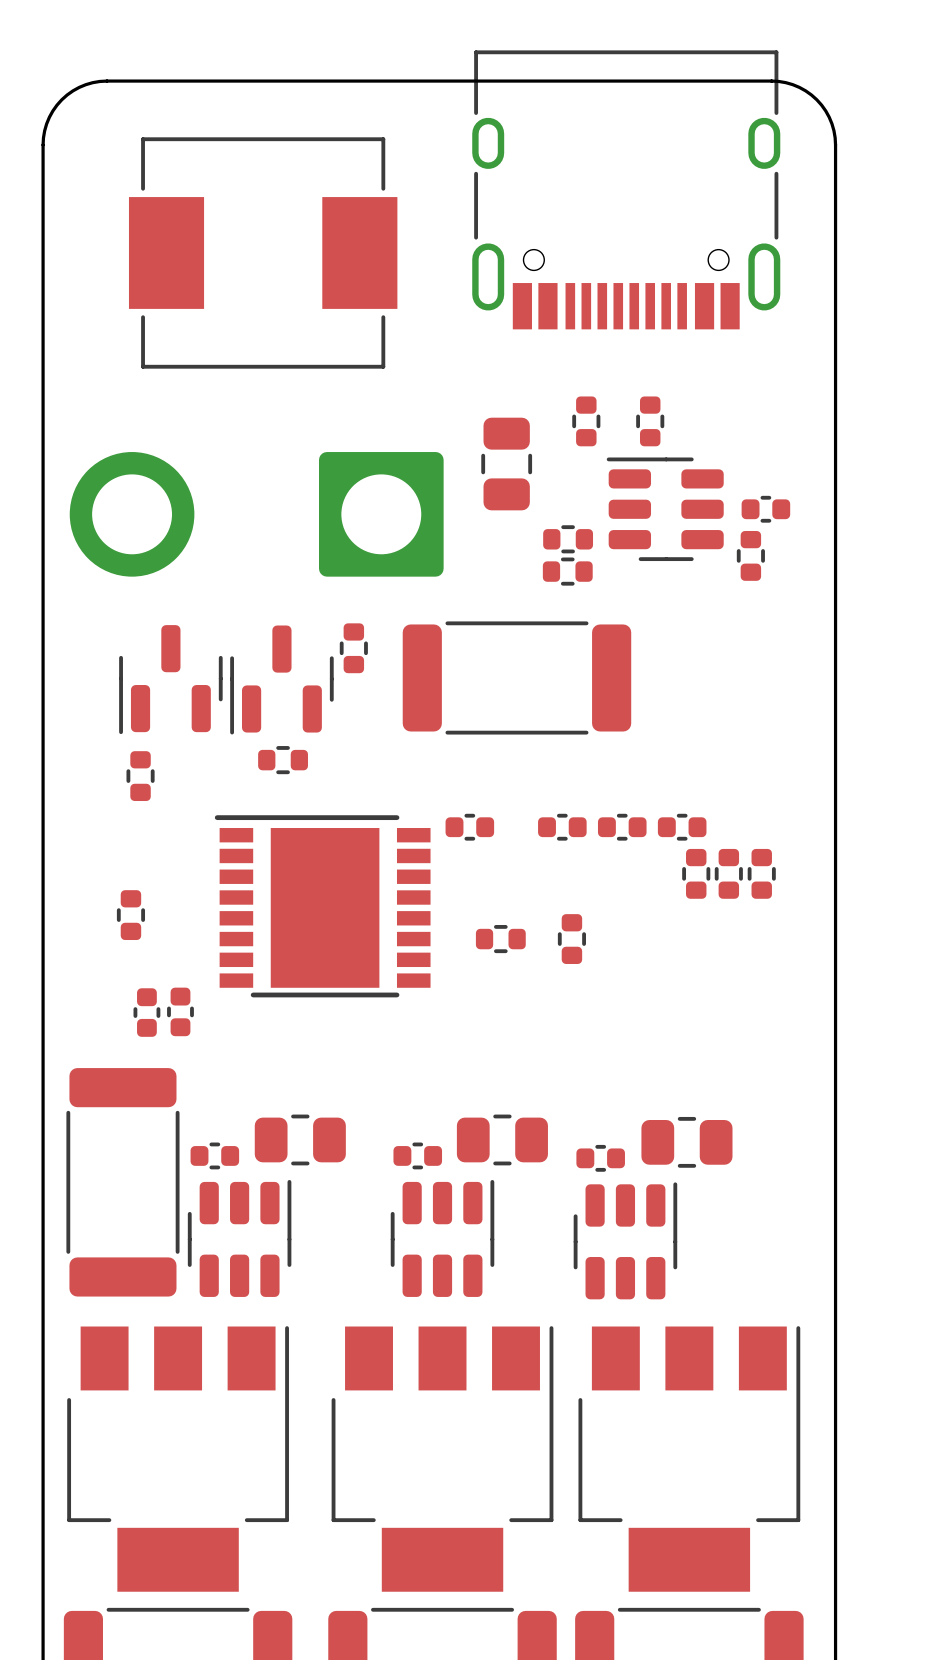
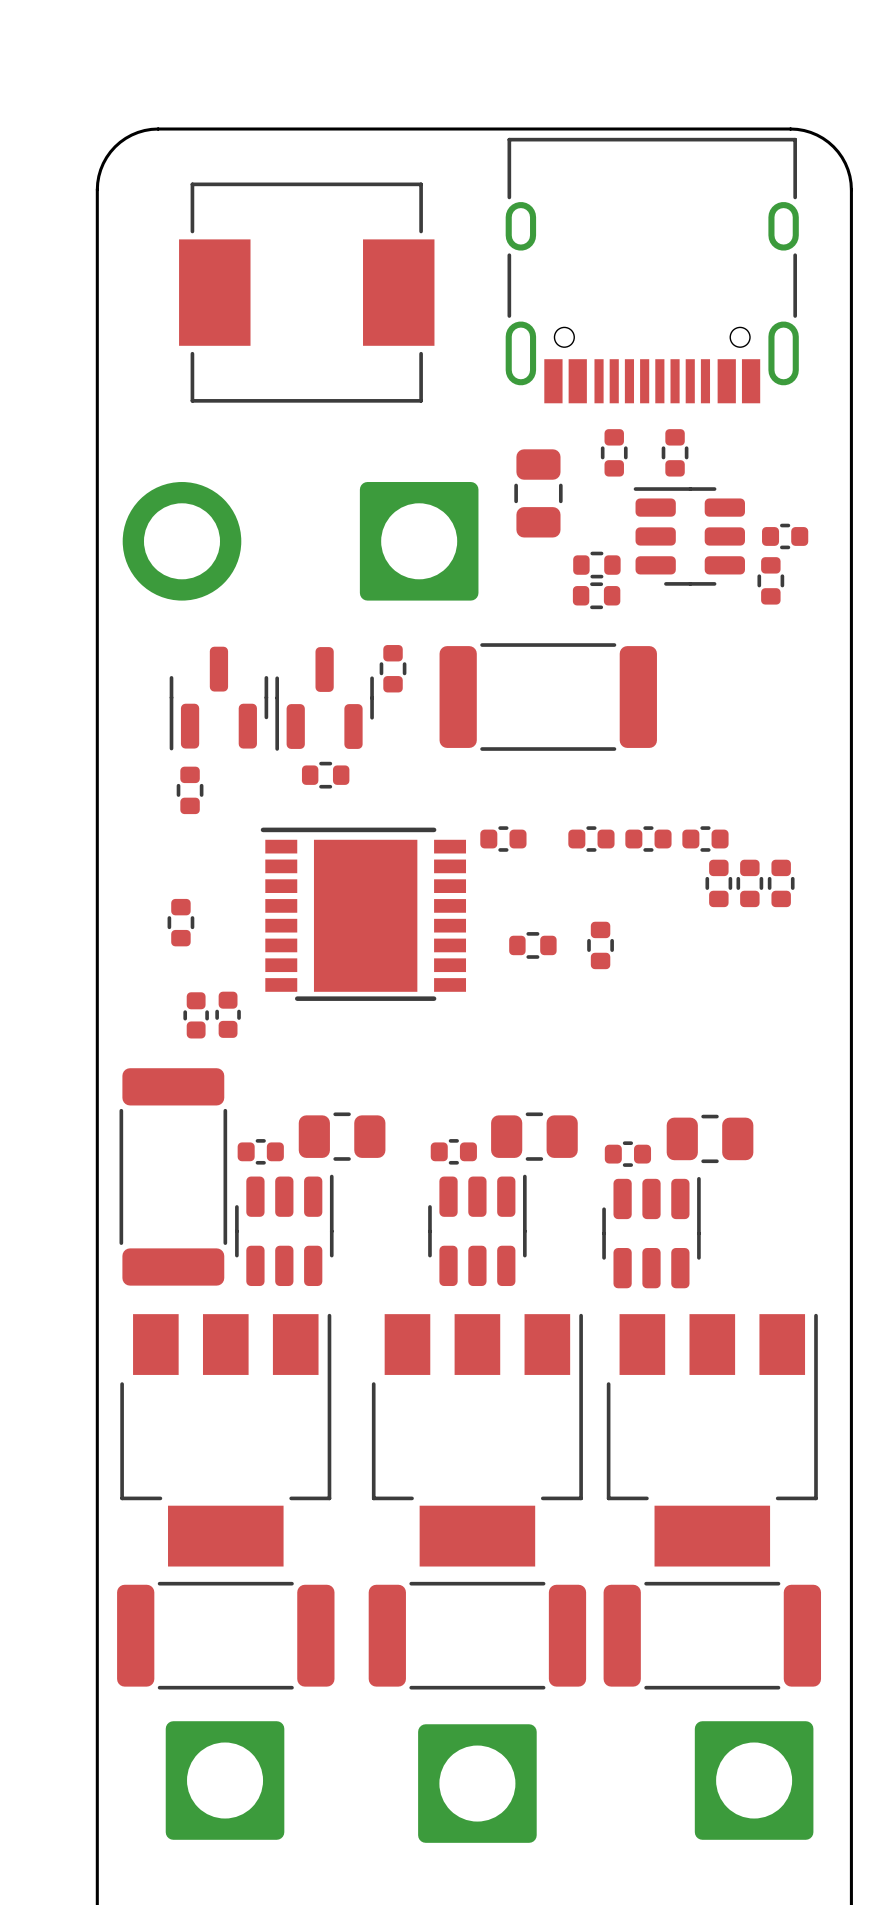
part position: (626, 189) -> (652, 270)

